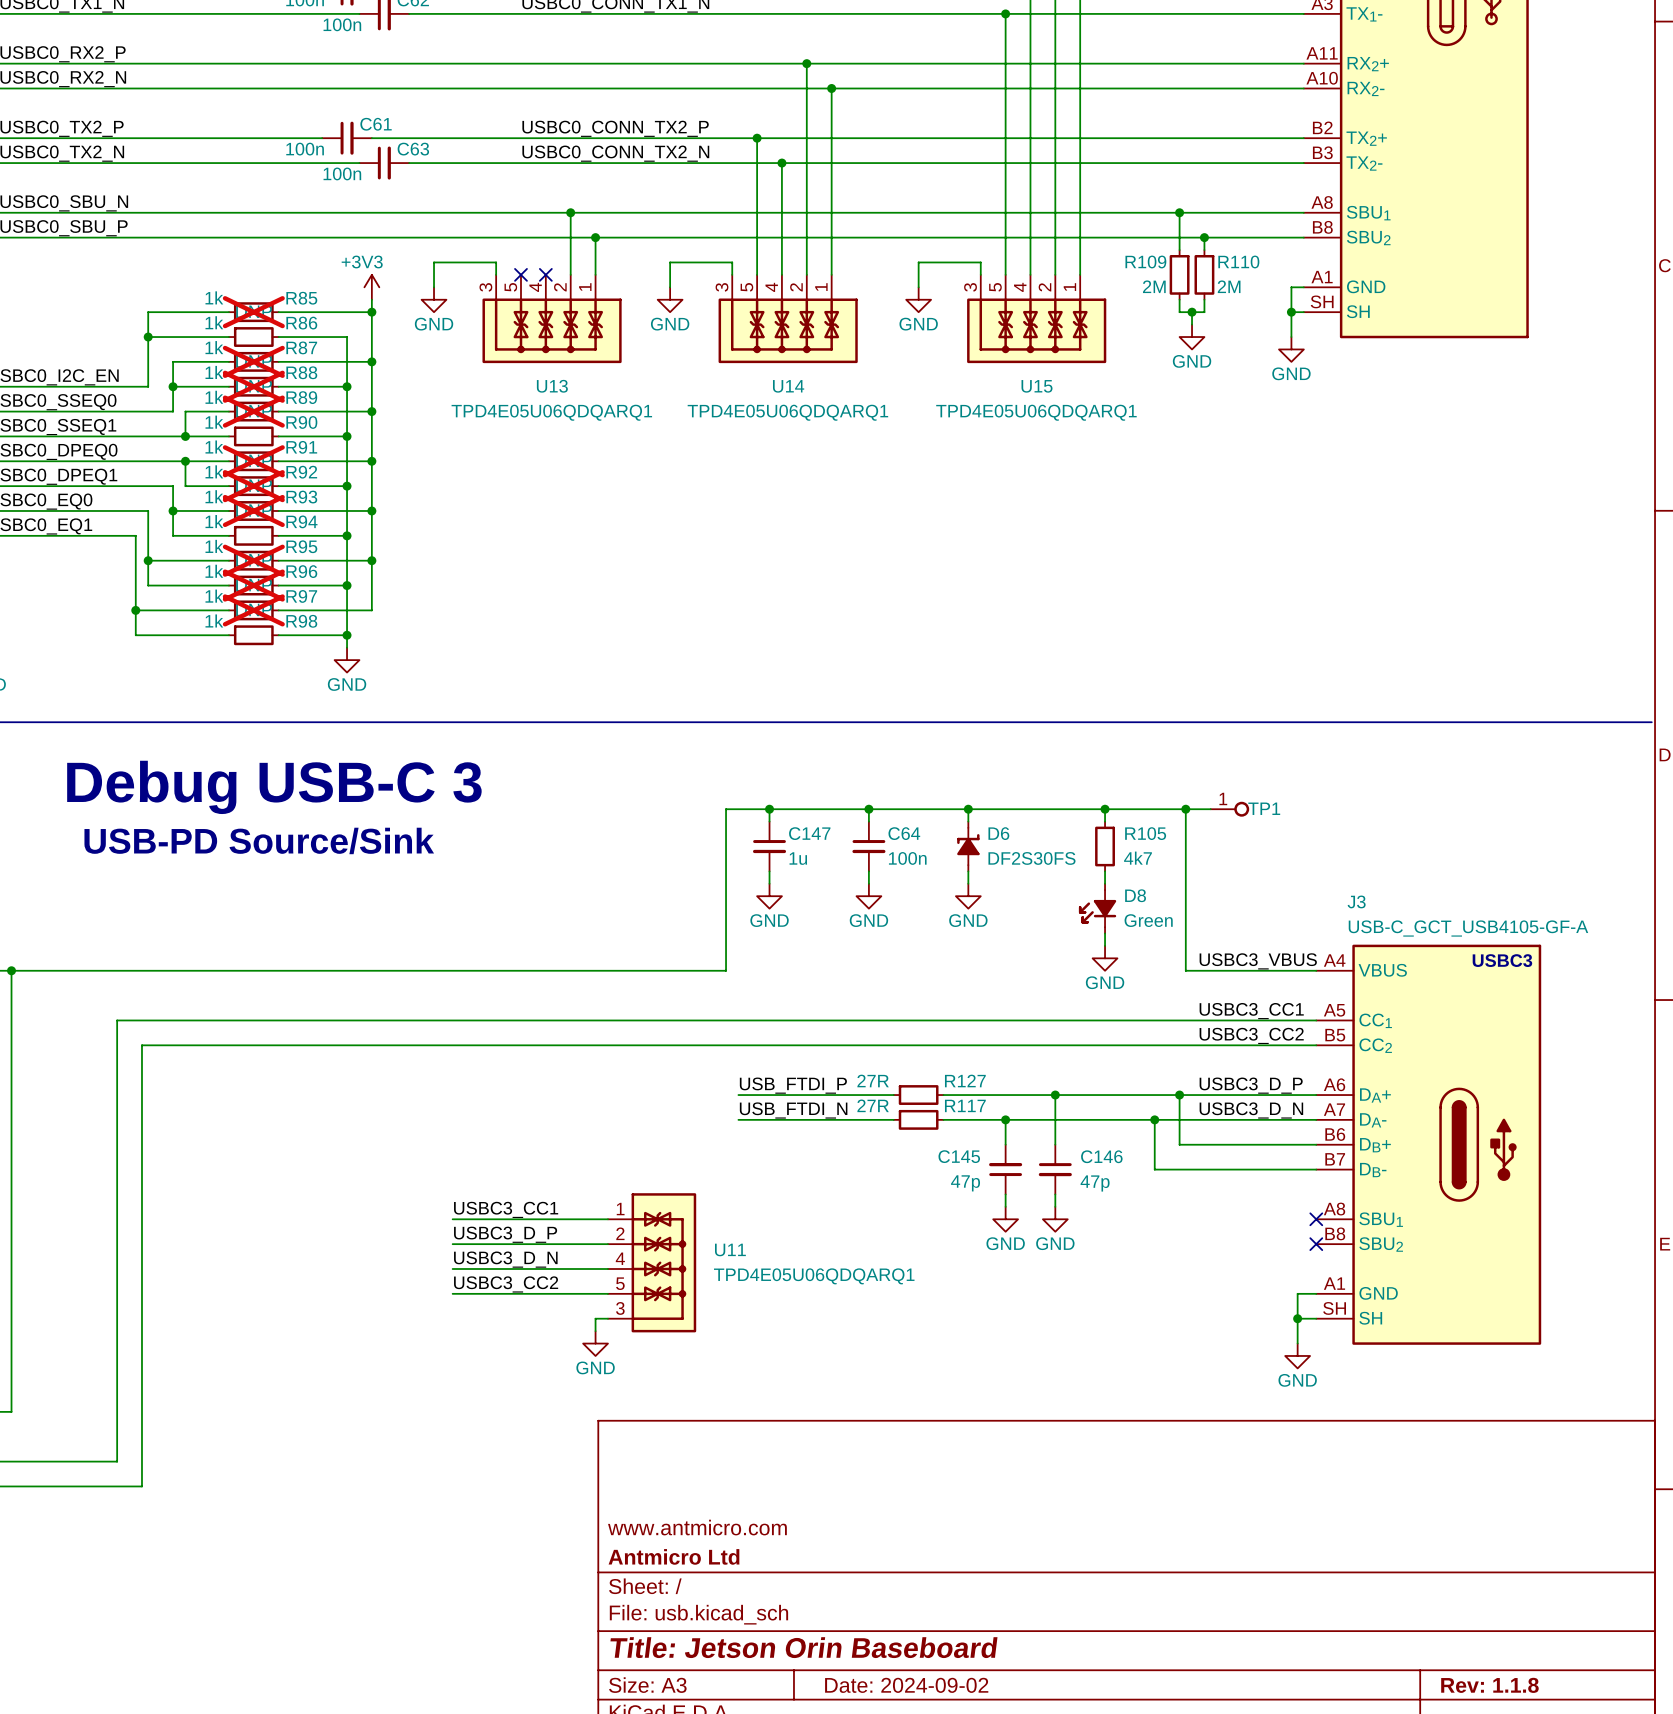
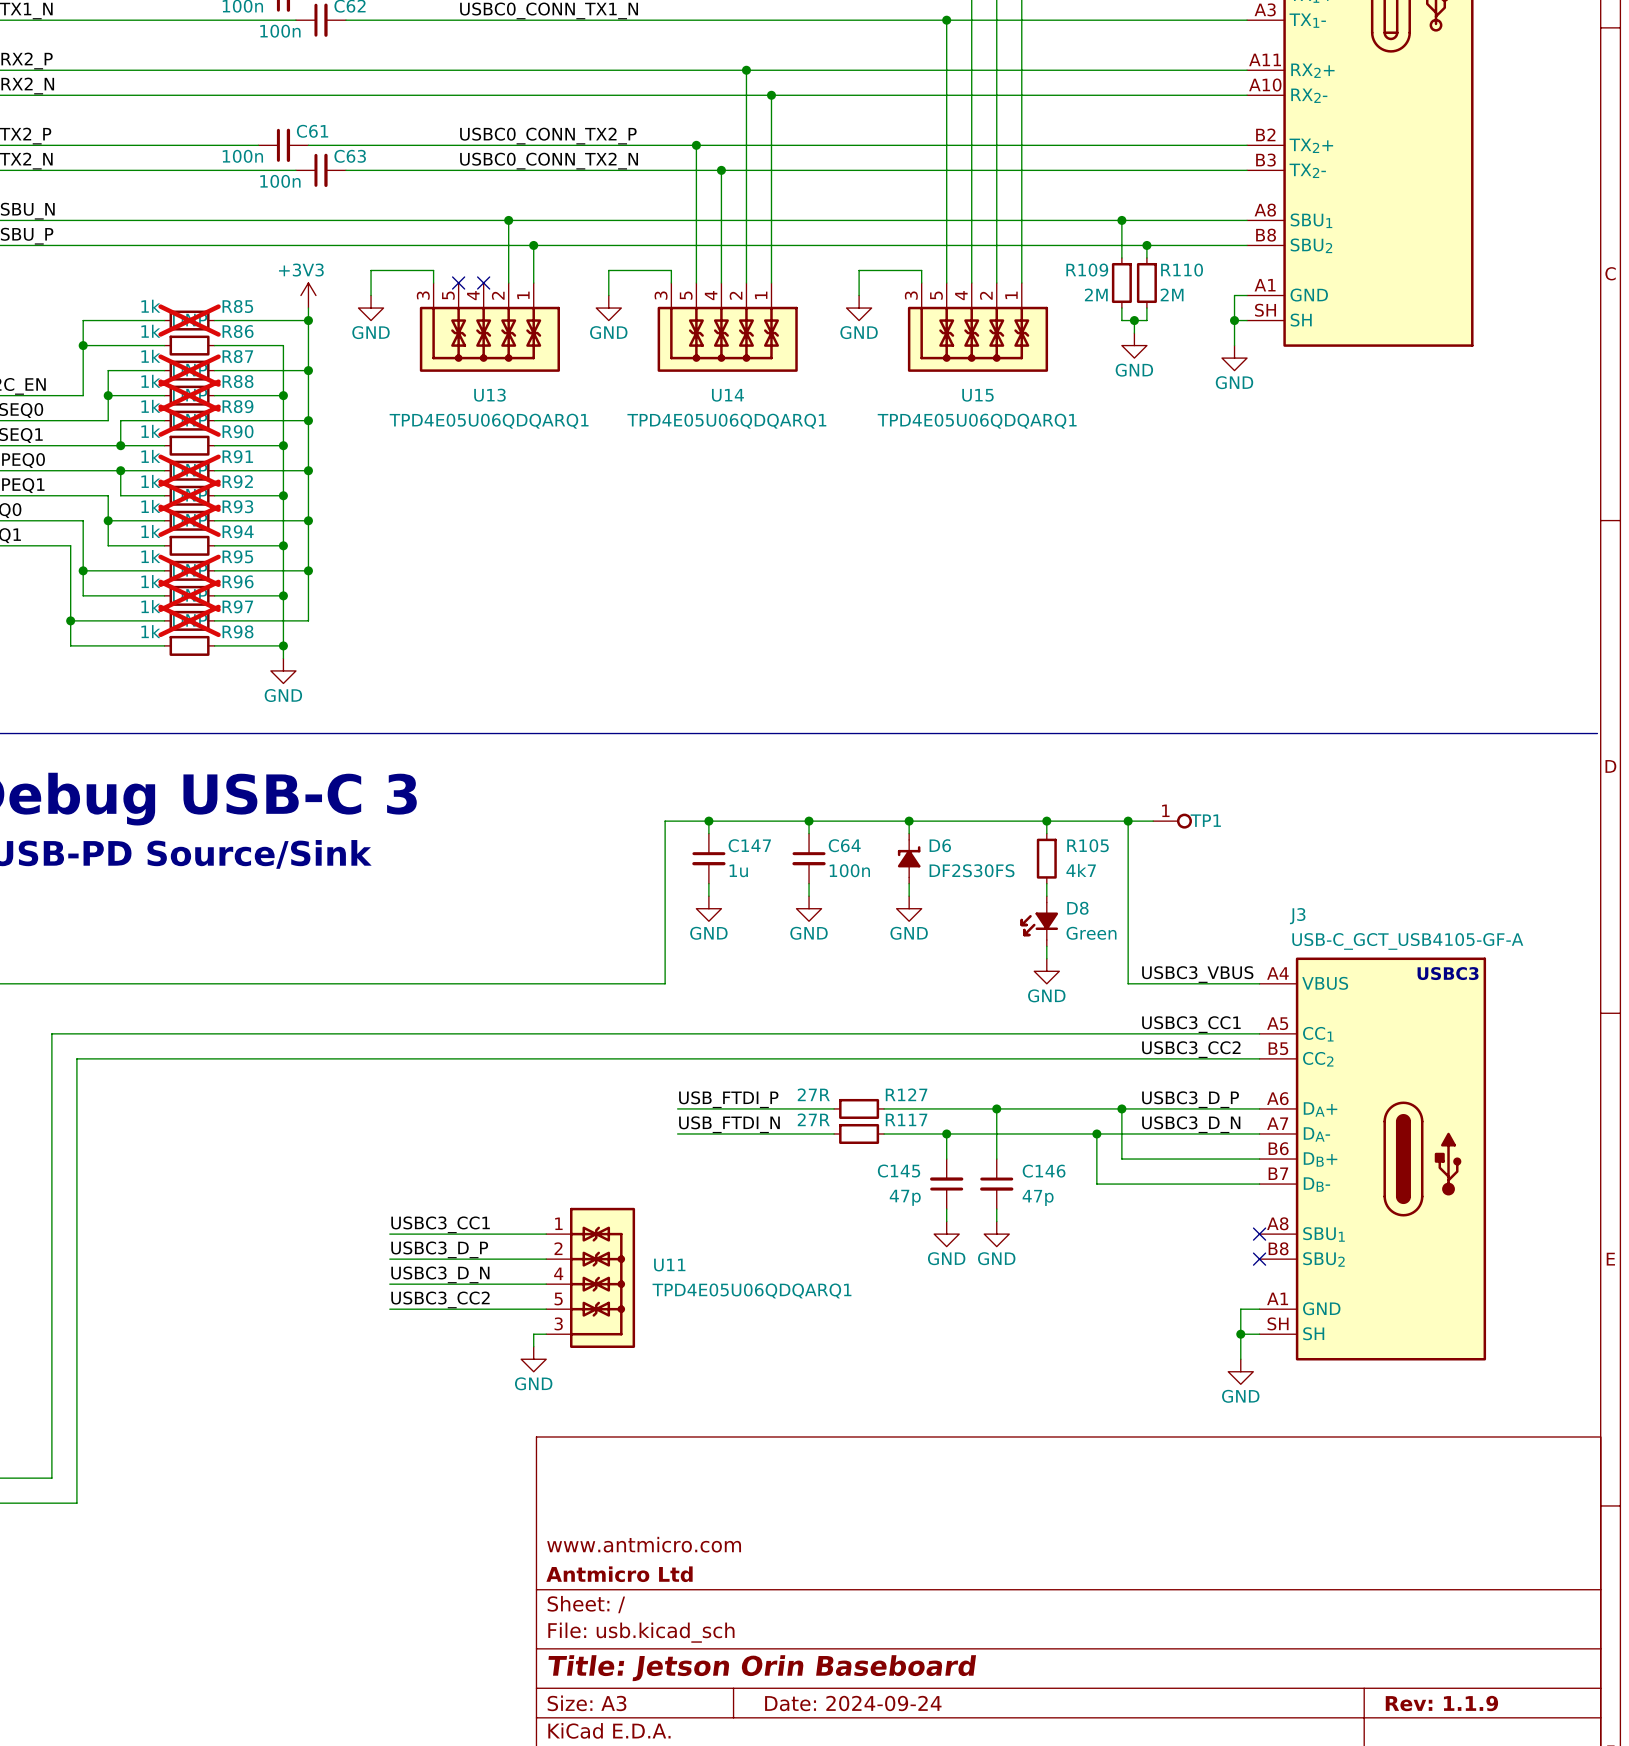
title block: Date: 2024-09-02 (906, 1685) -> Date: 2024-09-24 (853, 1703)
title block: Rev: 1.1.8 (1489, 1685) -> Rev: 1.1.9 (1441, 1703)

